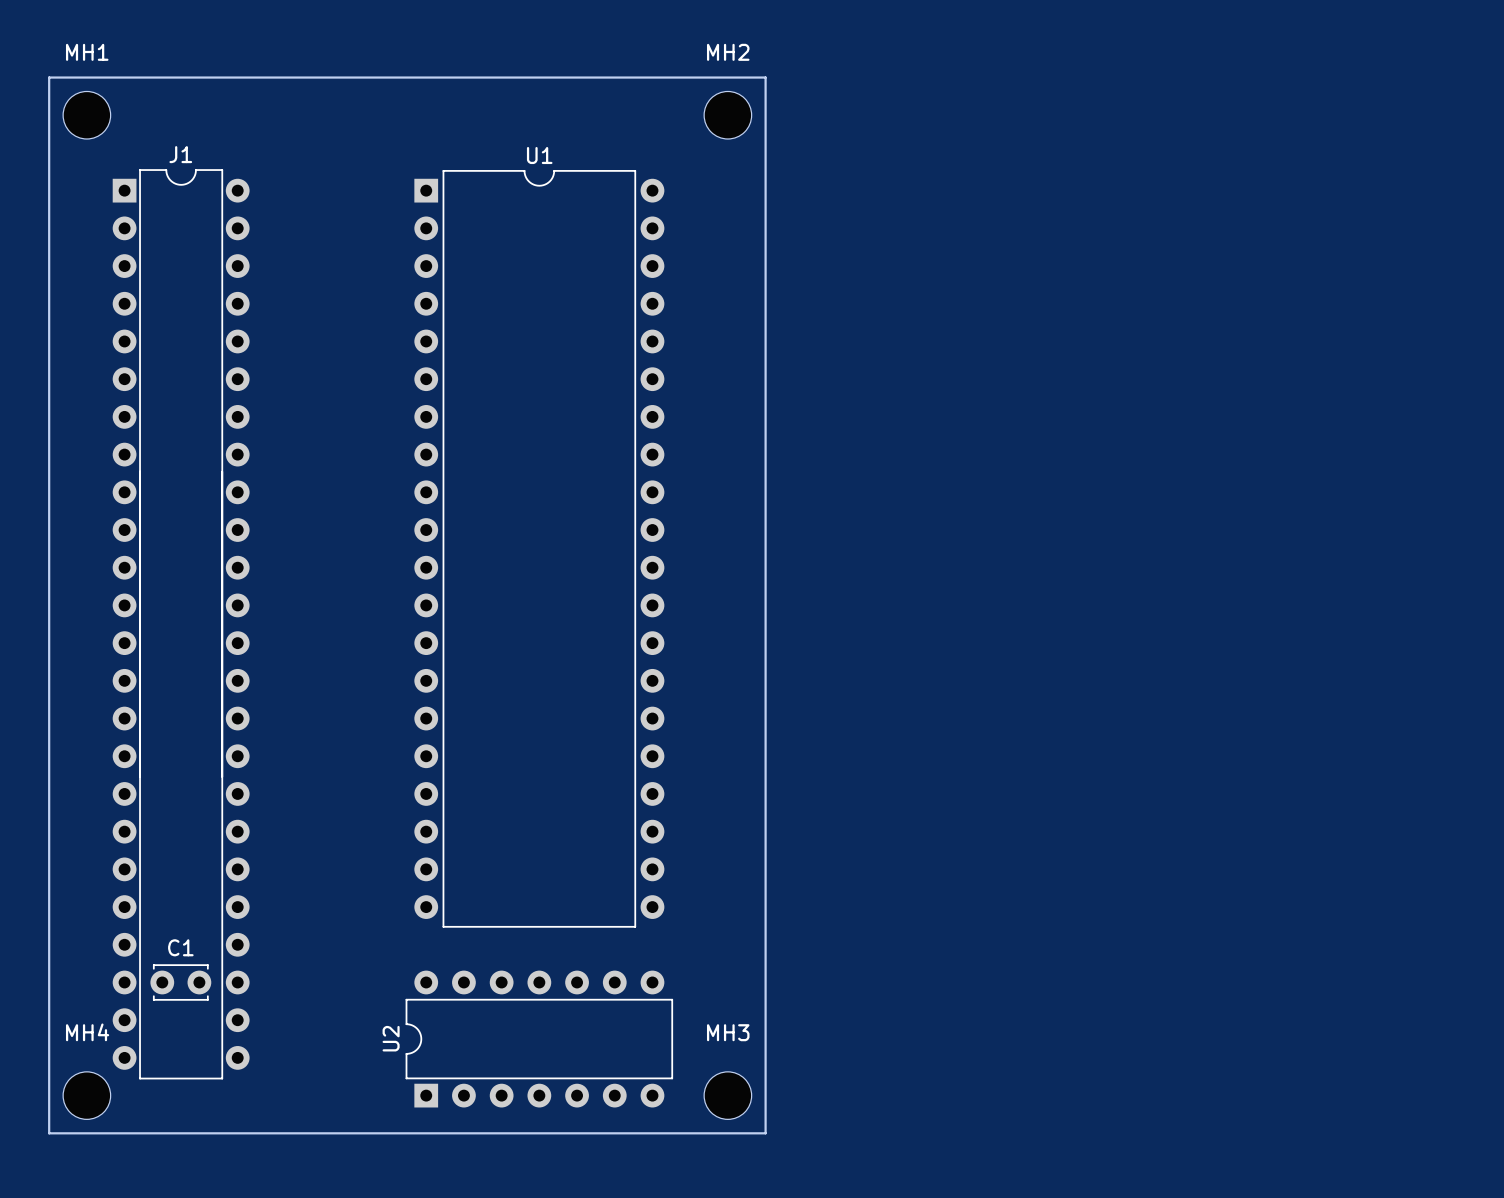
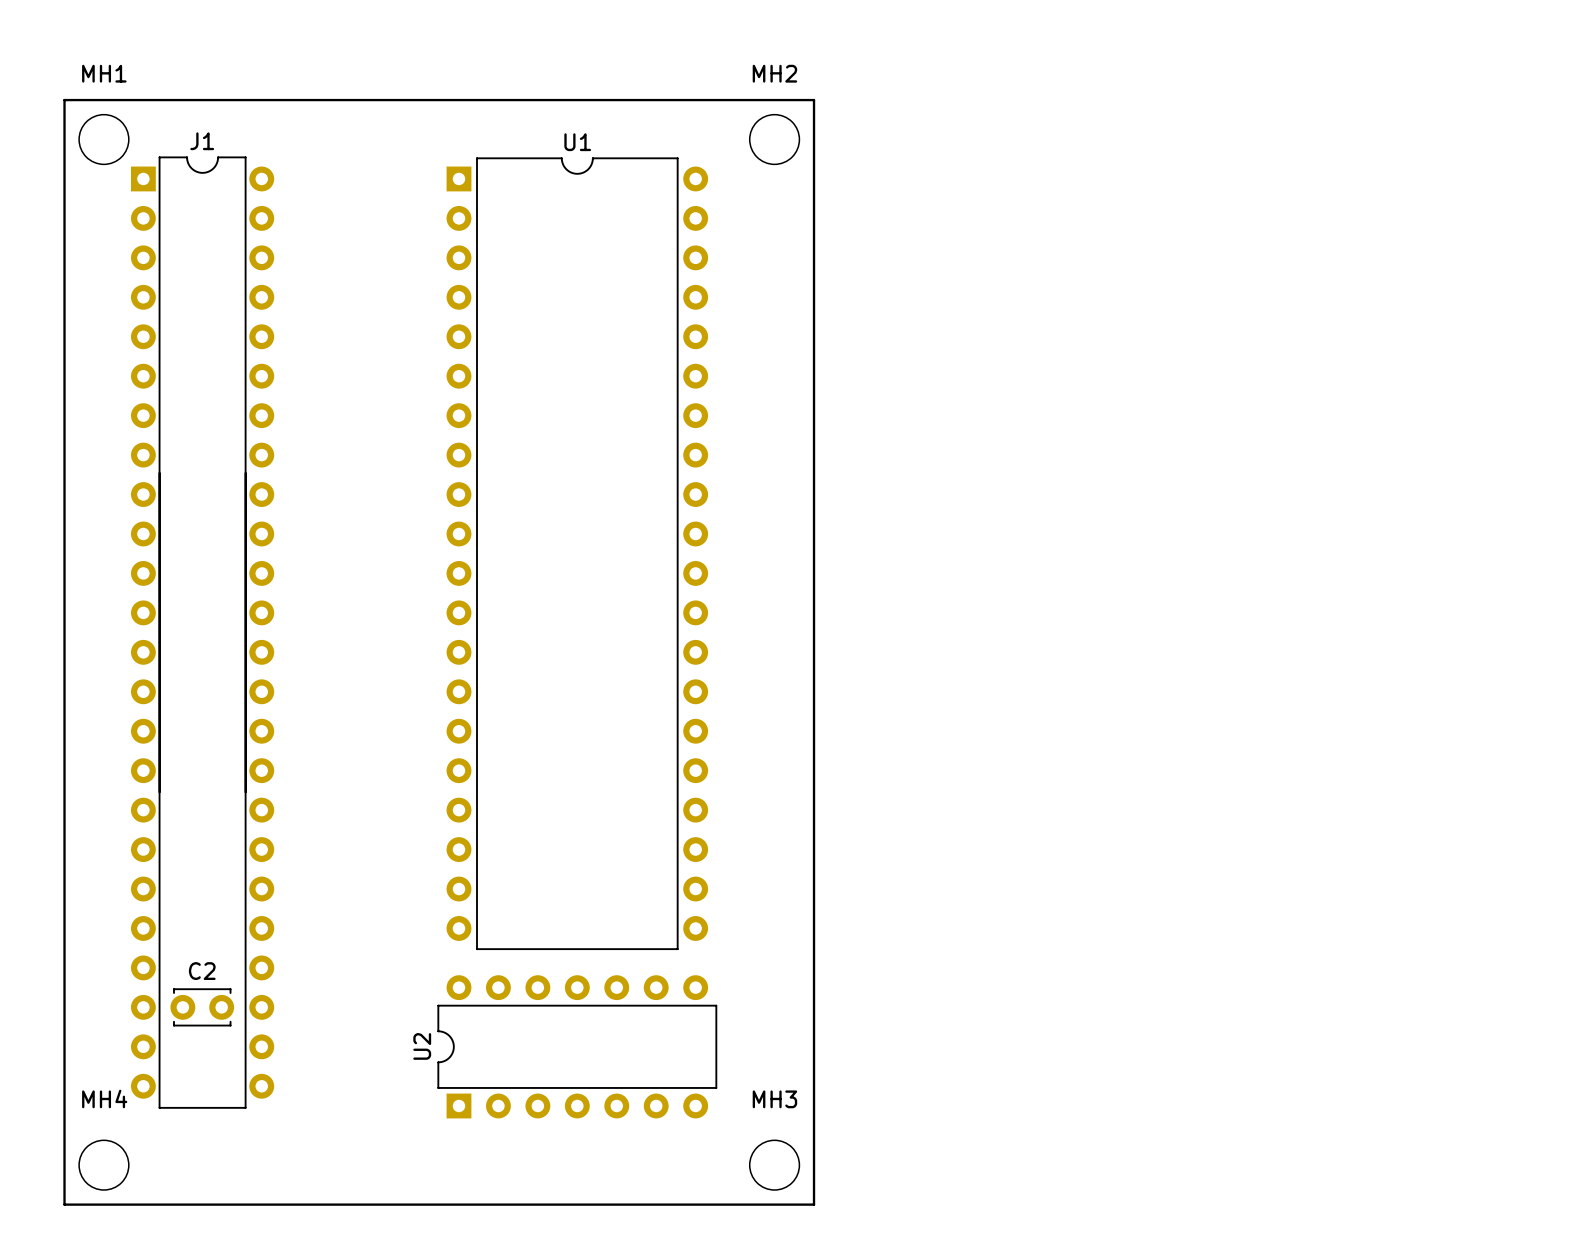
U1 position: (539, 548) -> (577, 553)
J1 position: (181, 624) -> (202, 632)
C2: none -> (202, 1007)
C1: (180, 982) -> none
U2 position: (539, 1039) -> (577, 1046)

